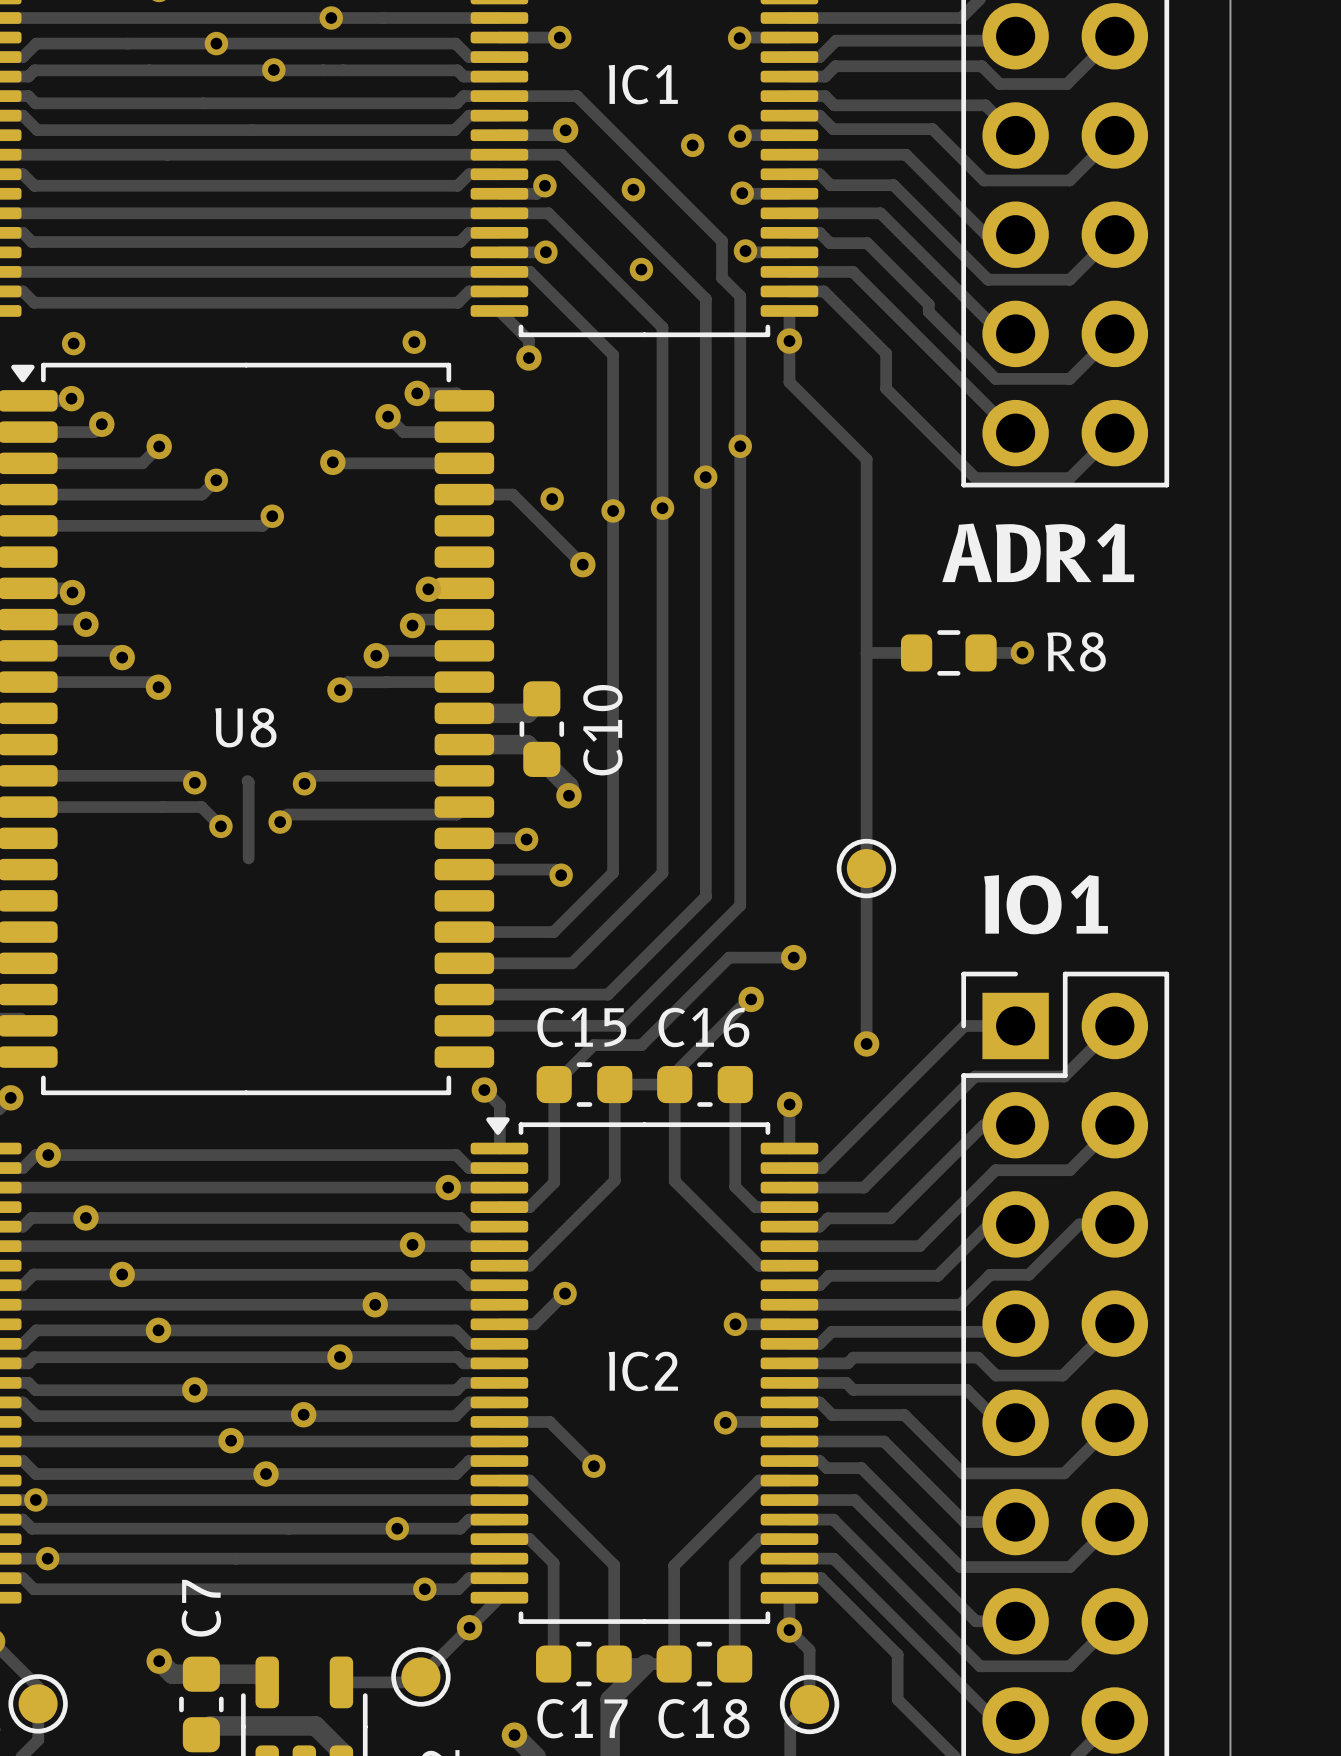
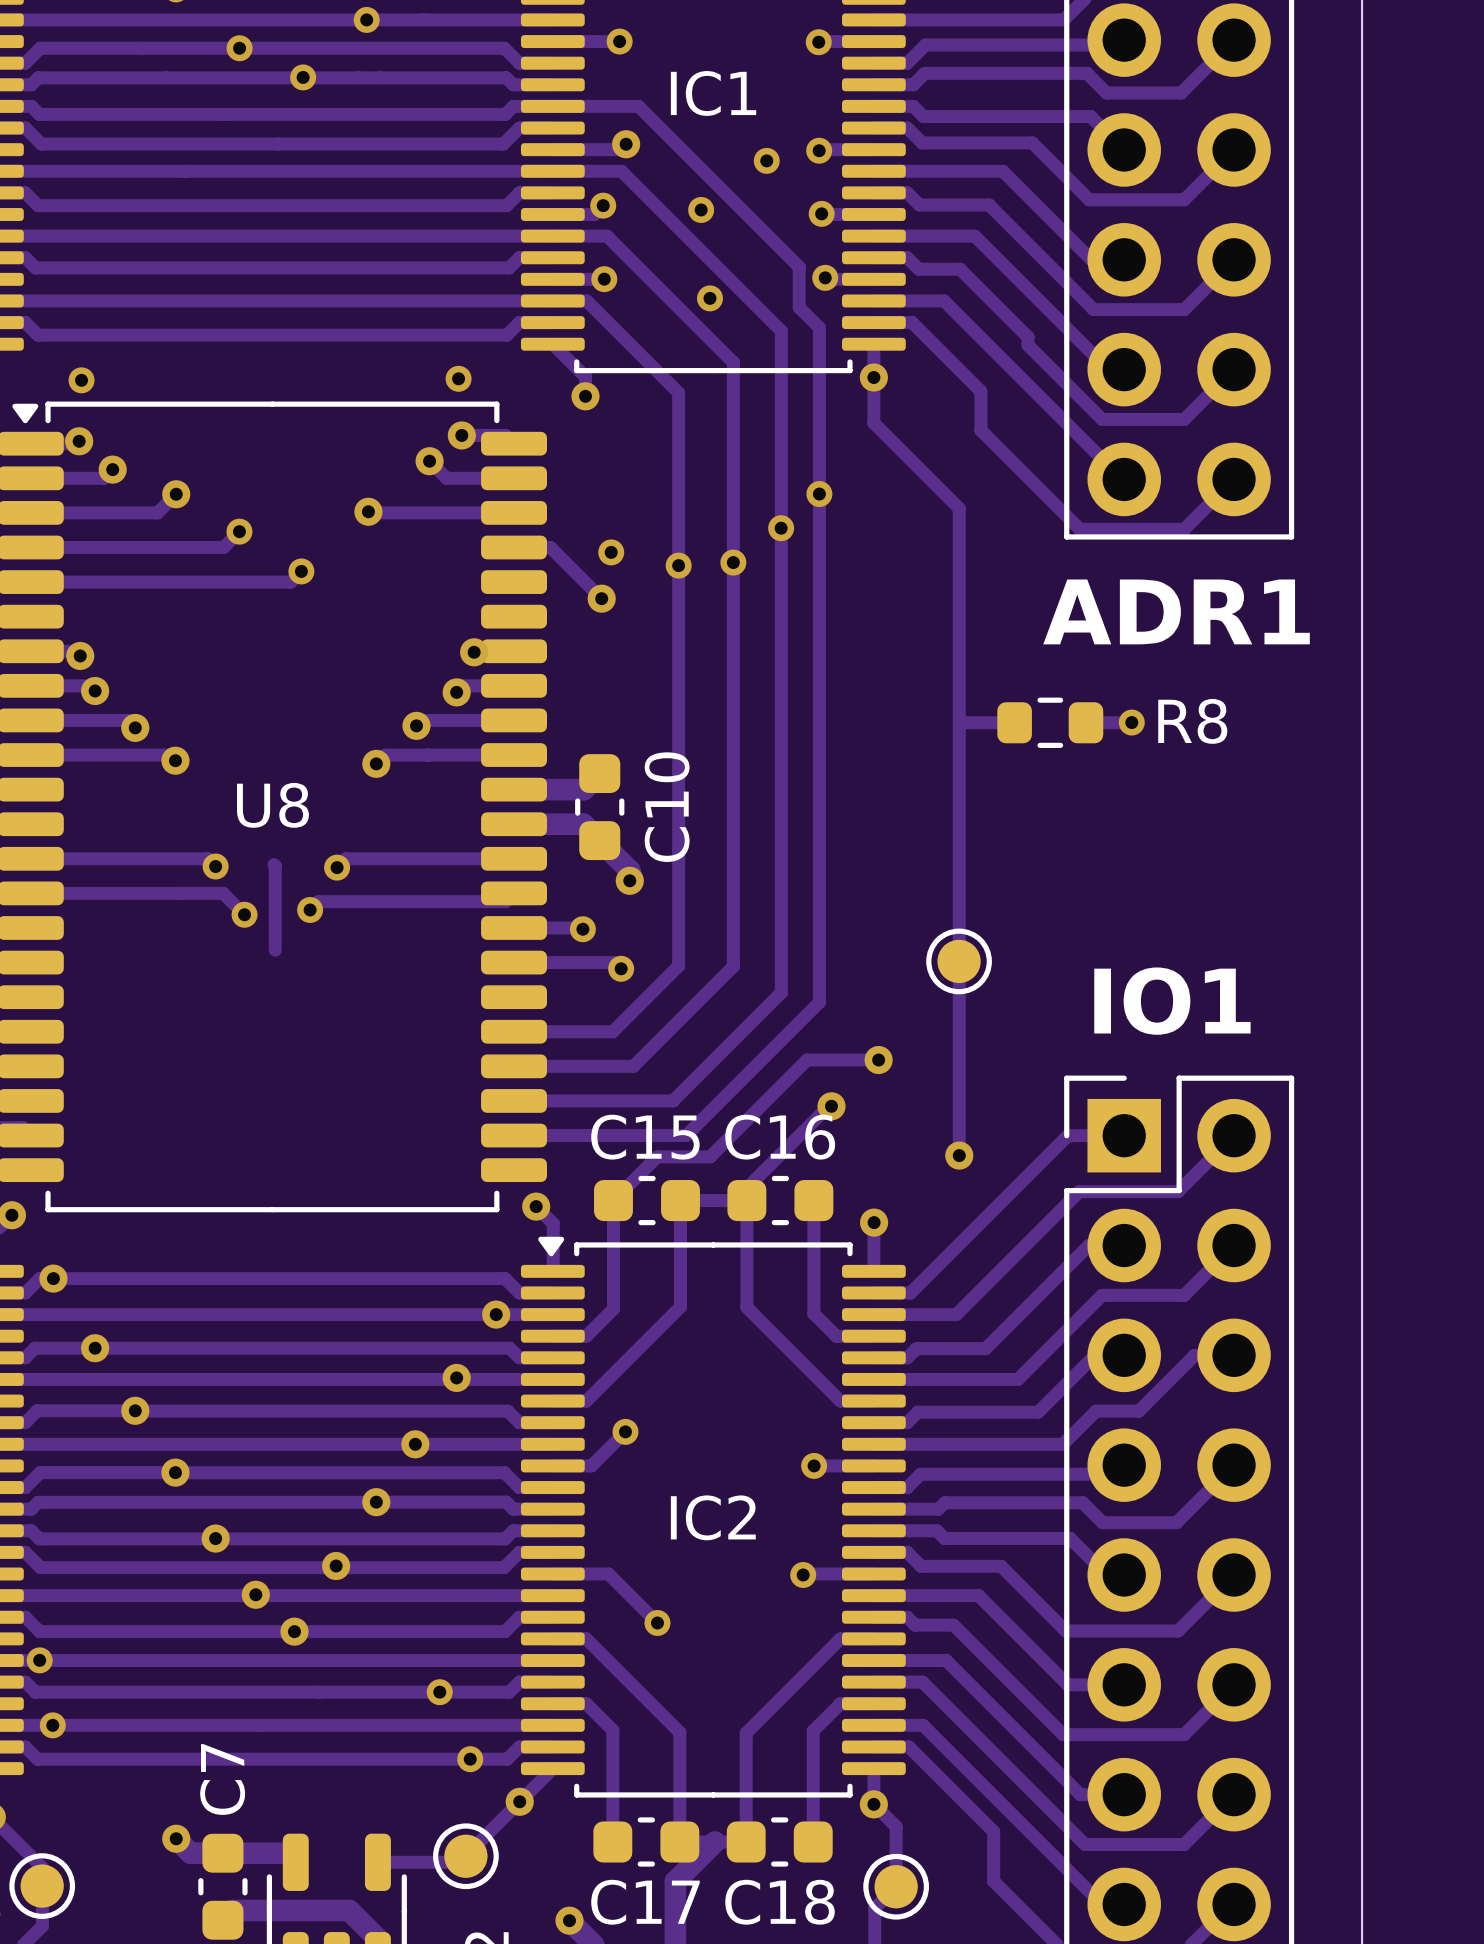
track: (497, 494) (512, 494) (582, 564) -> (550, 547) (601, 598)
via position: (582, 564) -> (601, 598)

